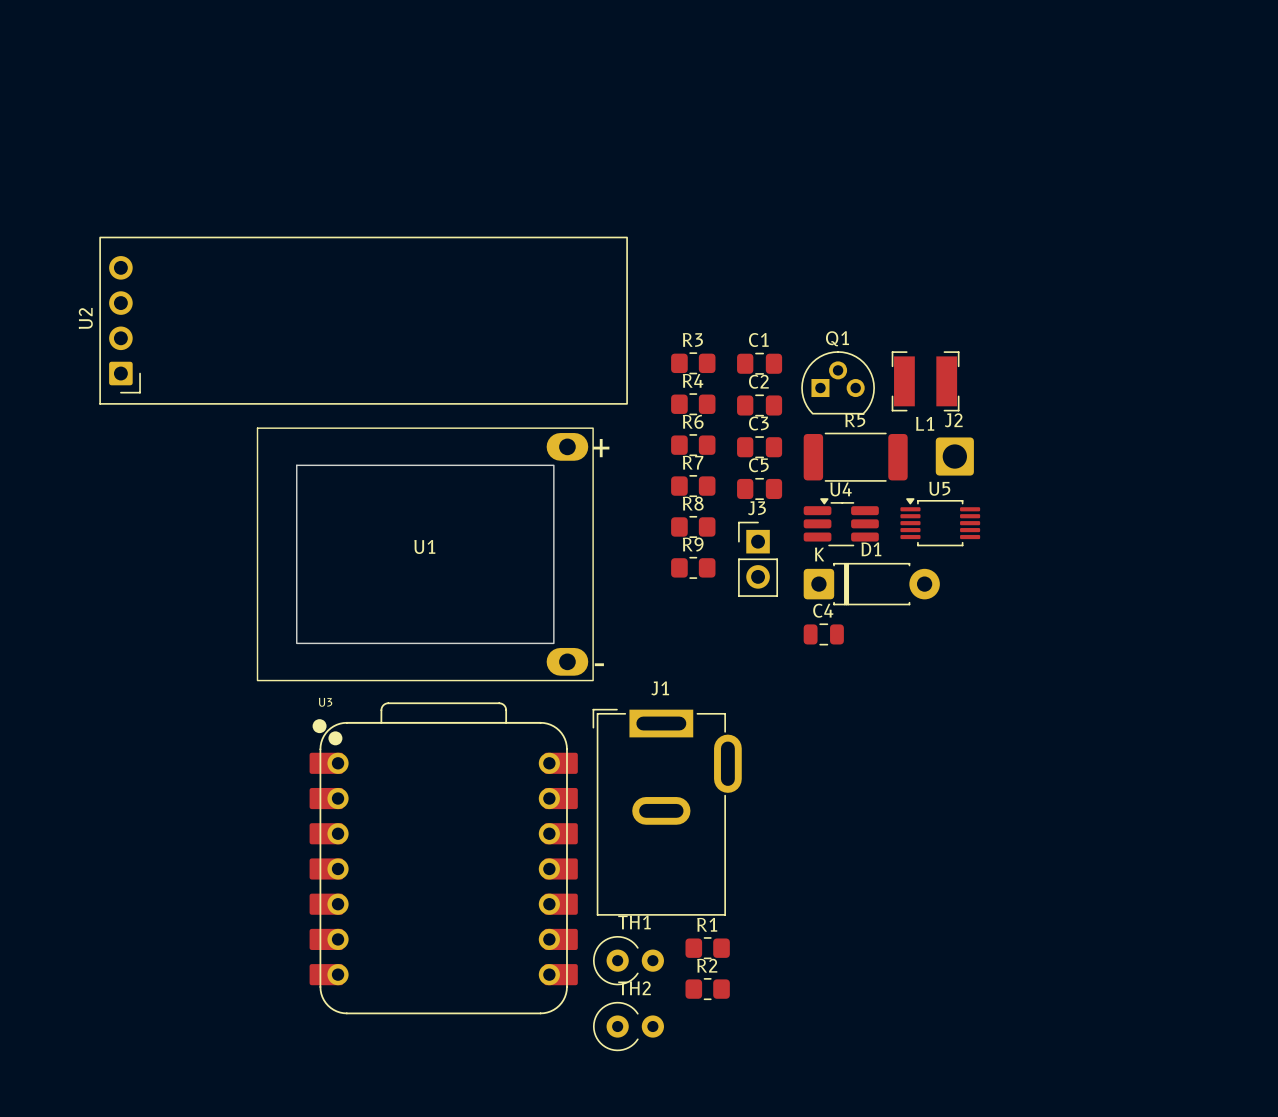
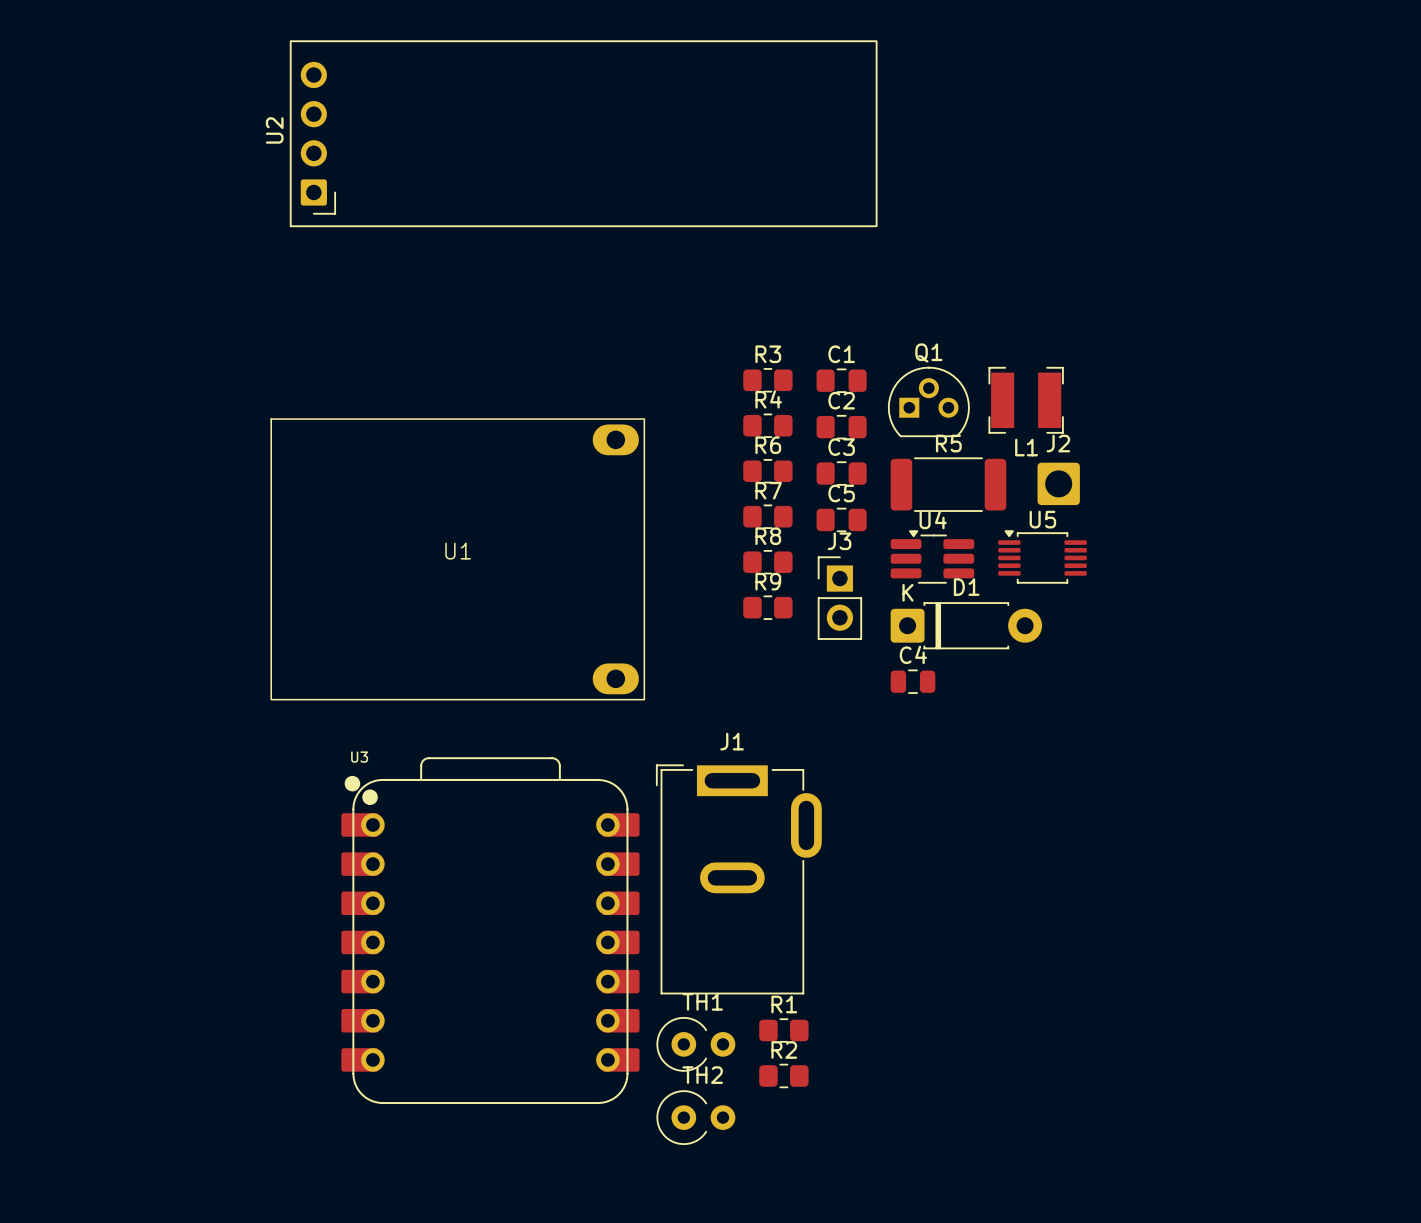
U2 position: (363, 320) -> (583, 133)
U1 footprint: [256, 427, 594, 682] -> [270, 418, 646, 701]

